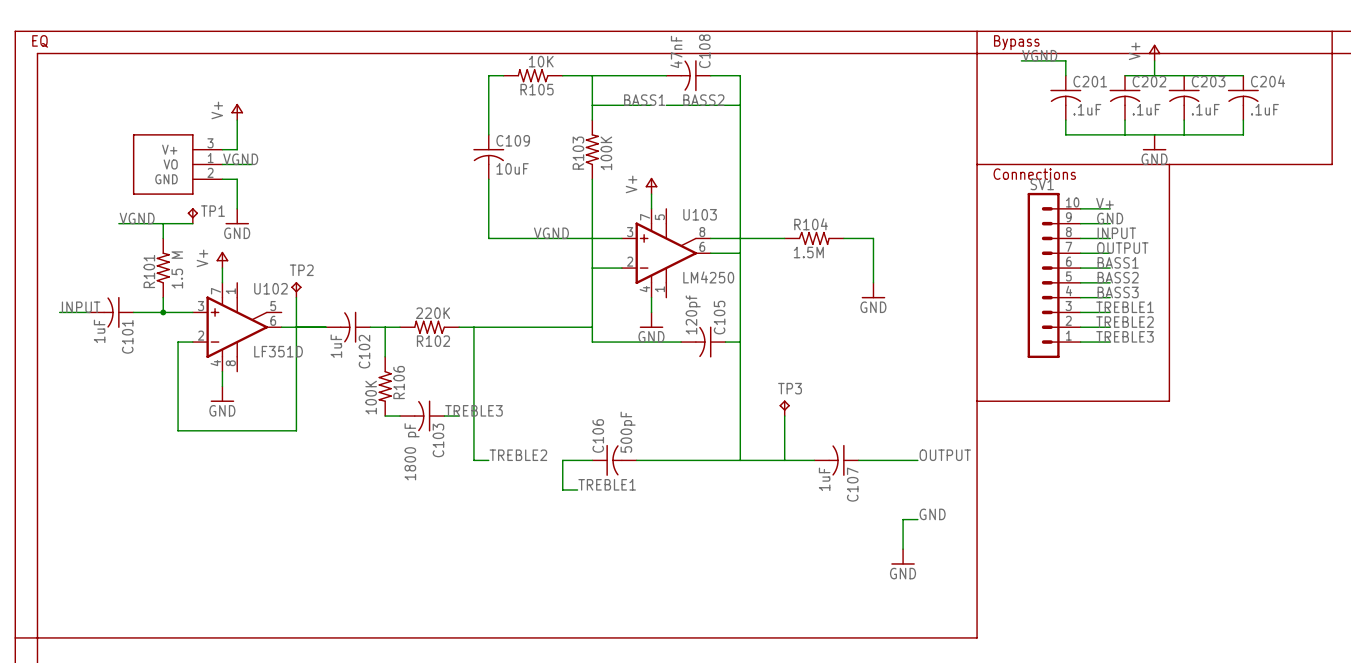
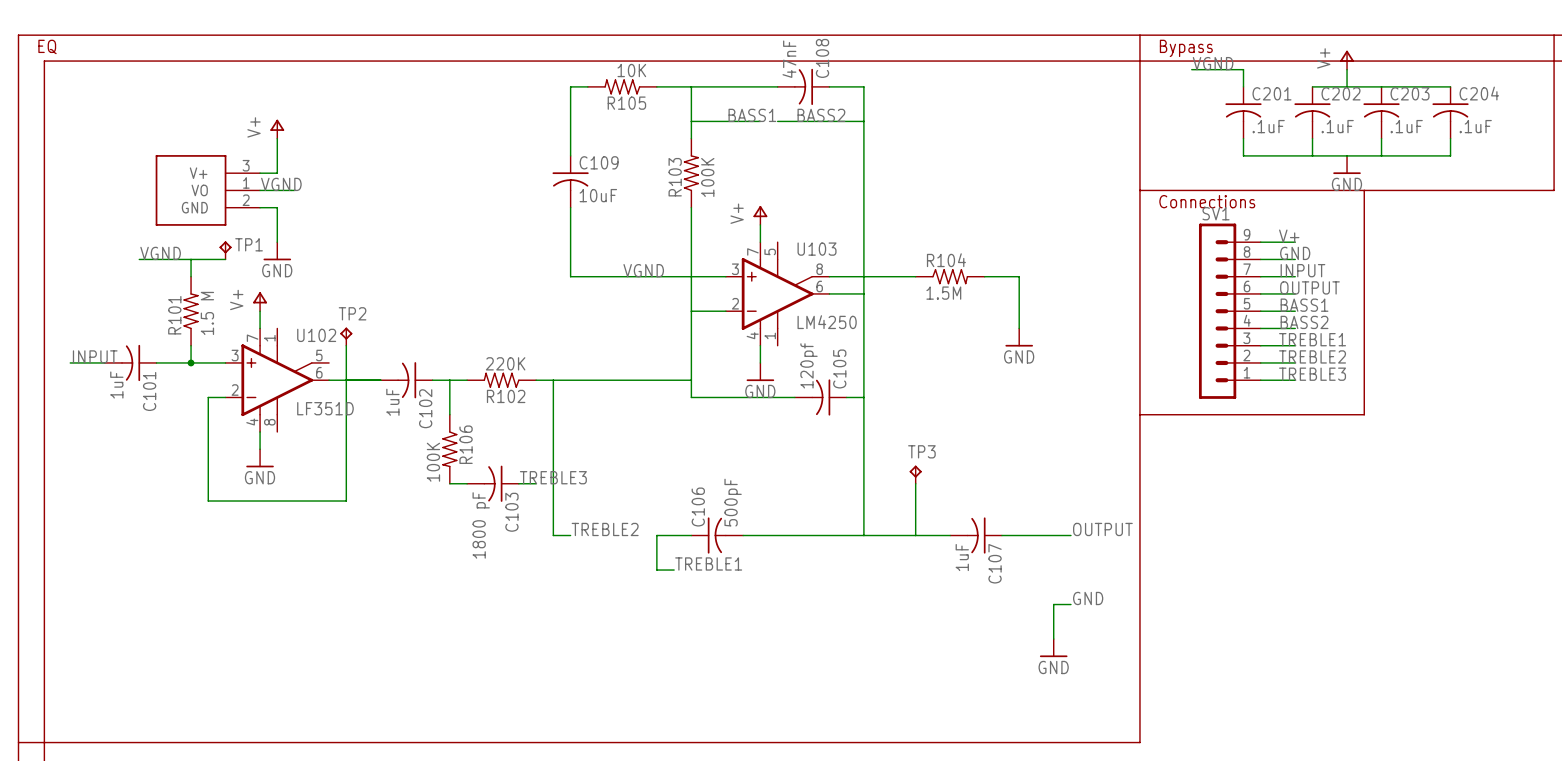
SV1 symbol: [1027, 192, 1081, 359] -> [1198, 223, 1261, 399]
label: BASS3 (1118, 292) -> TREBLE1 (1312, 339)
label: TREBLE1 (1125, 307) -> TREBLE2 (1312, 356)
label: TREBLE2 (1125, 322) -> TREBLE3 (1312, 374)
label: TREBLE3 (1125, 336) -> none
wire: (1080, 342) (1110, 342) -> none
line: (1169, 356) (1169, 401) (977, 401) -> (1364, 414) (1139, 414)

